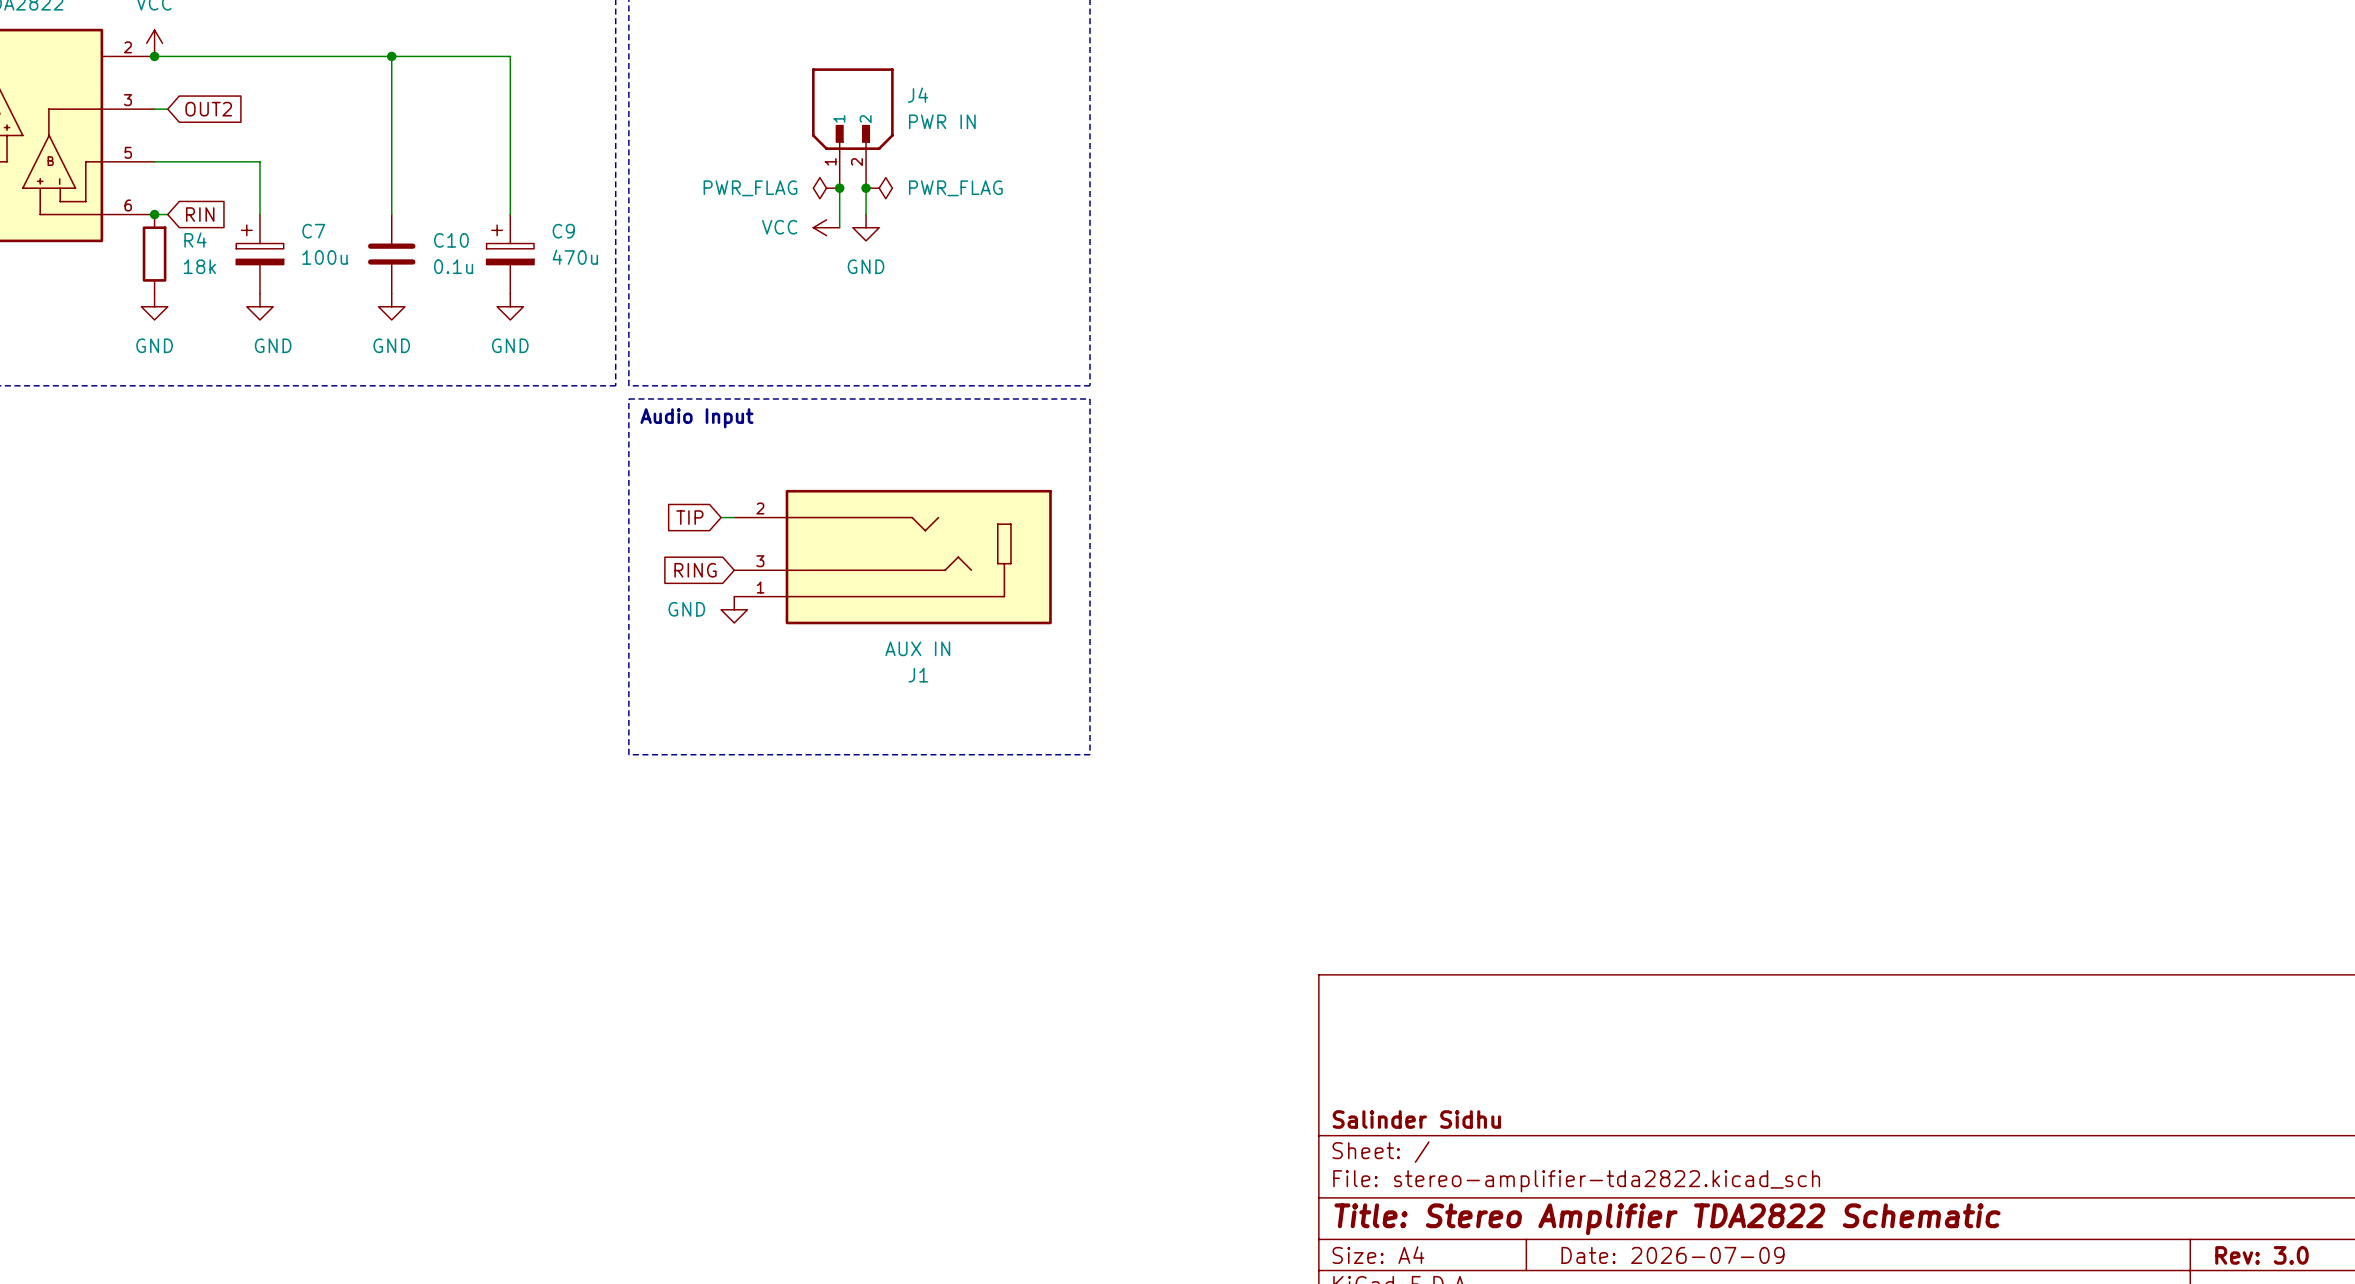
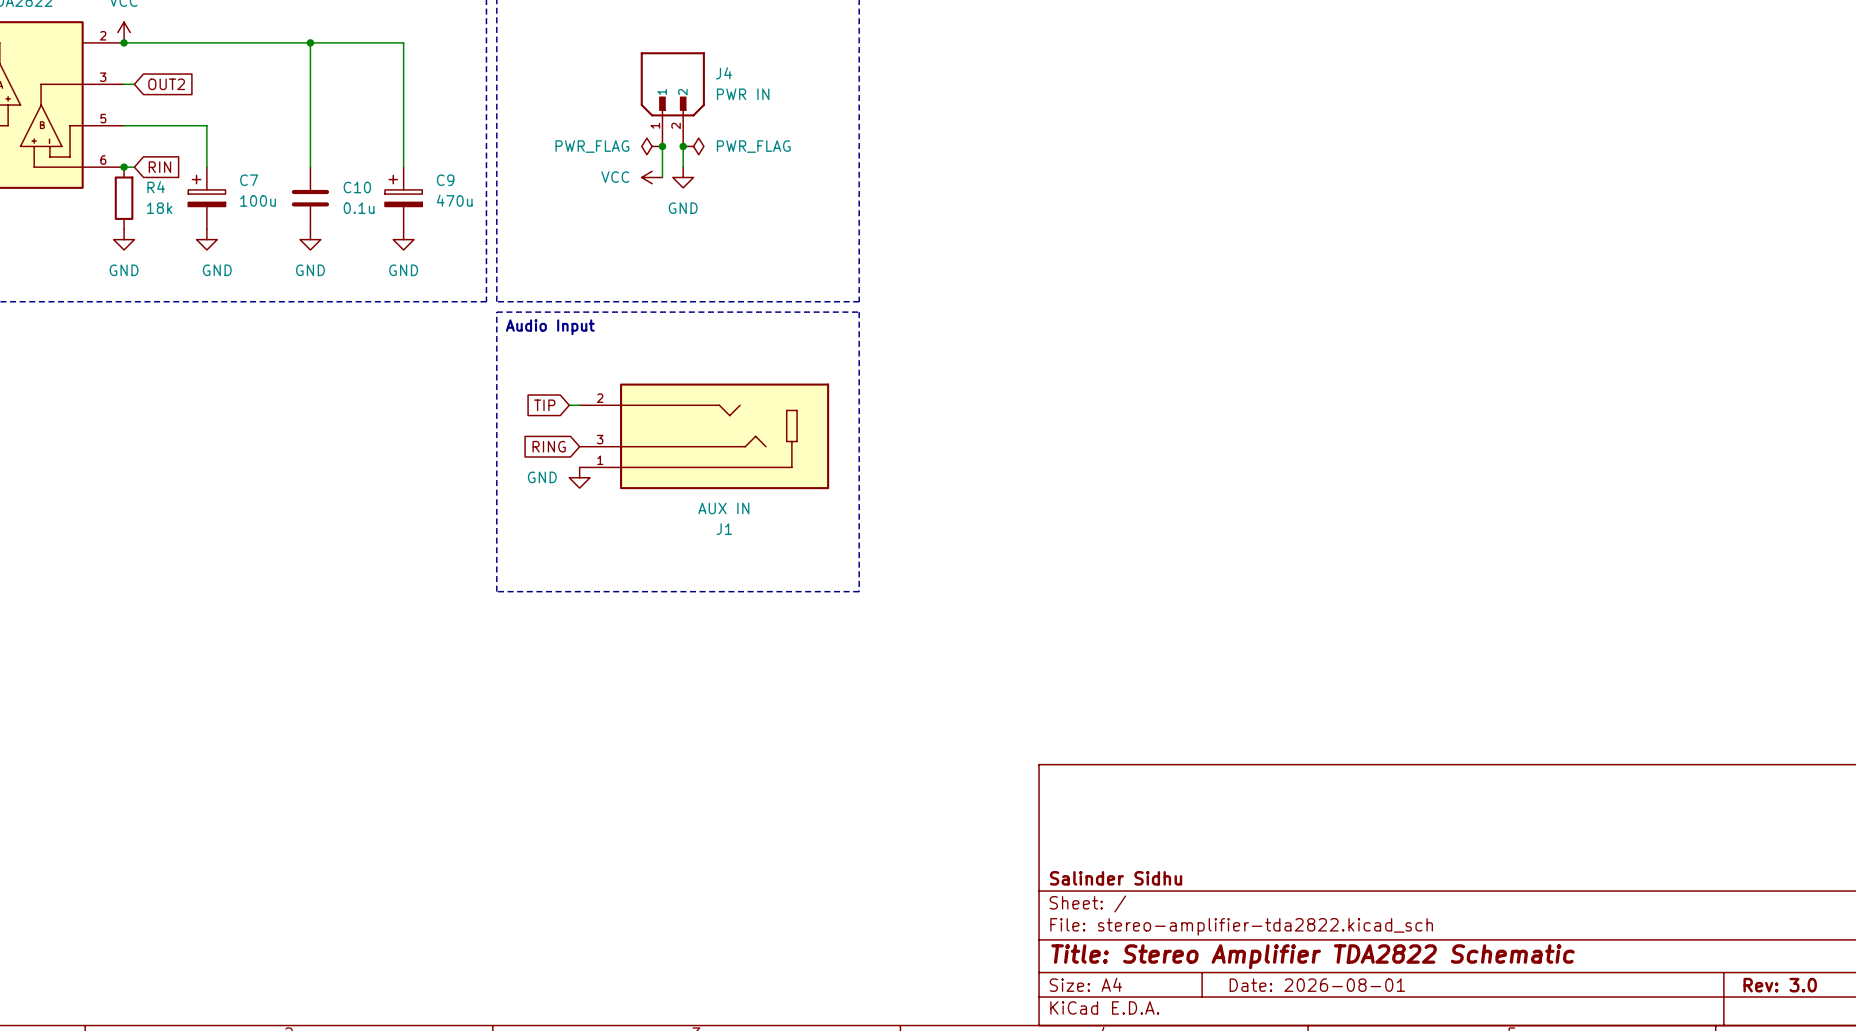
title block: Date: 2026-07-09 (1672, 1255) -> Date: 2026-08-01 (1317, 985)

